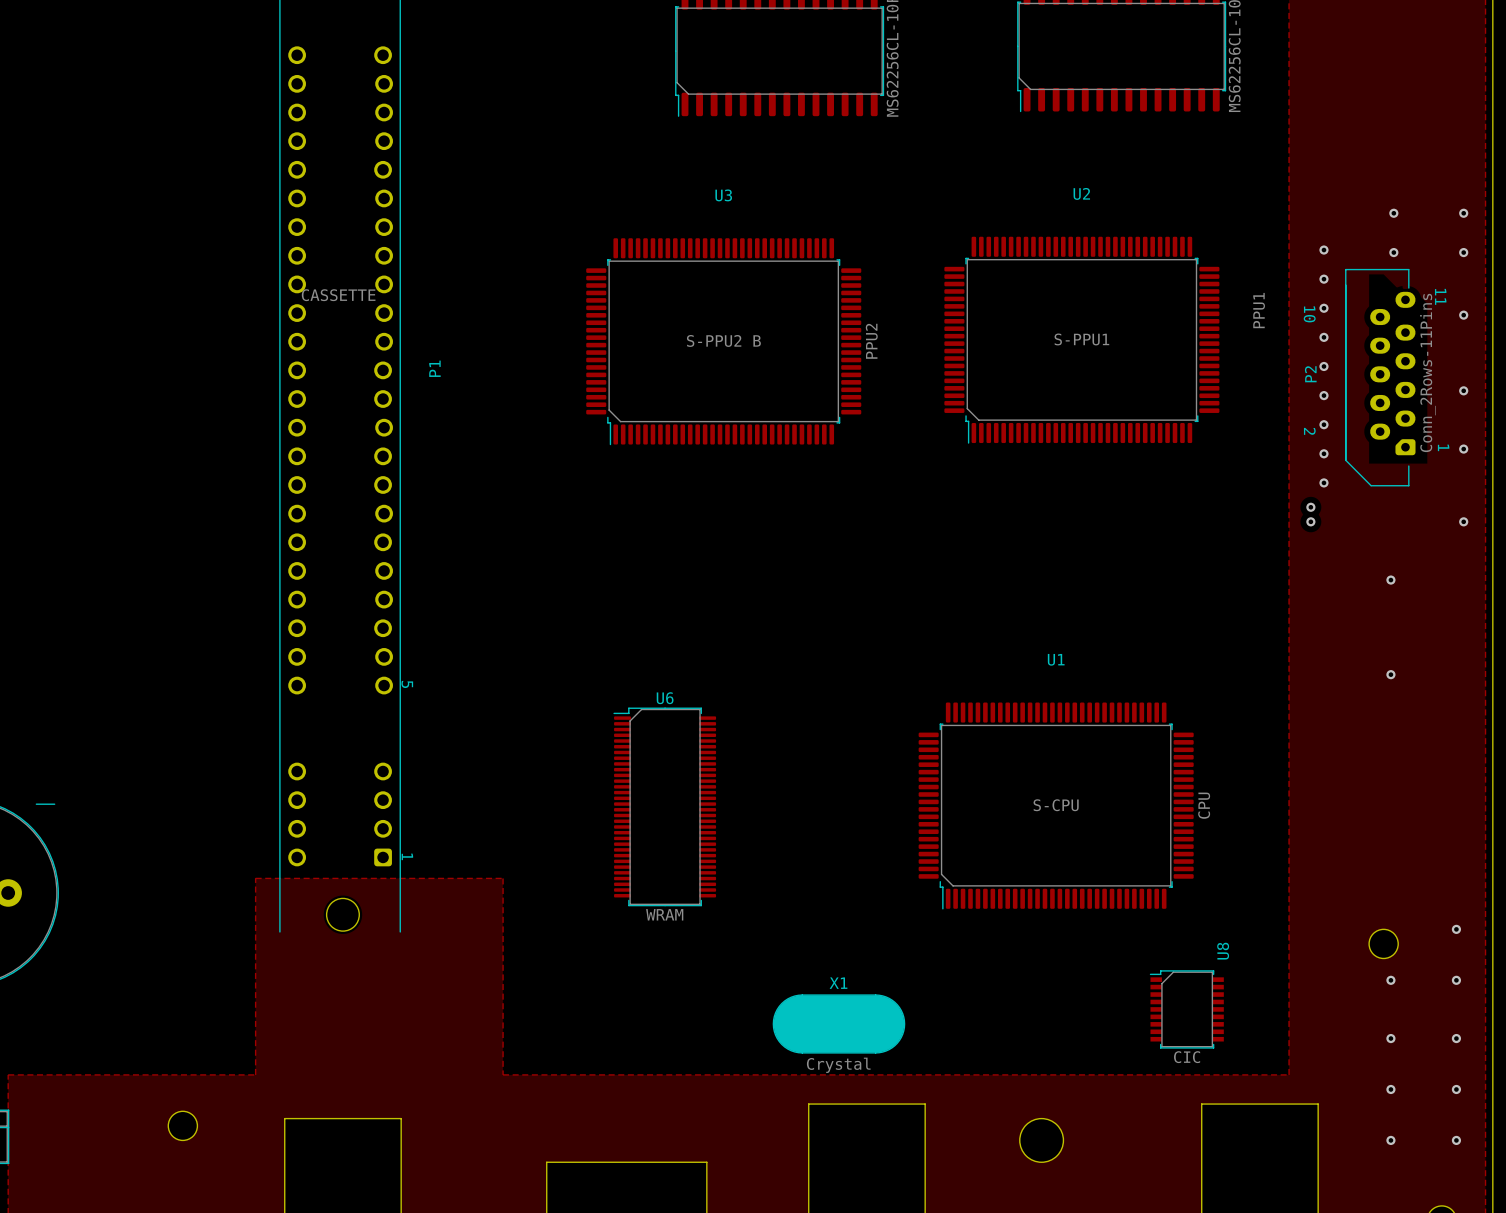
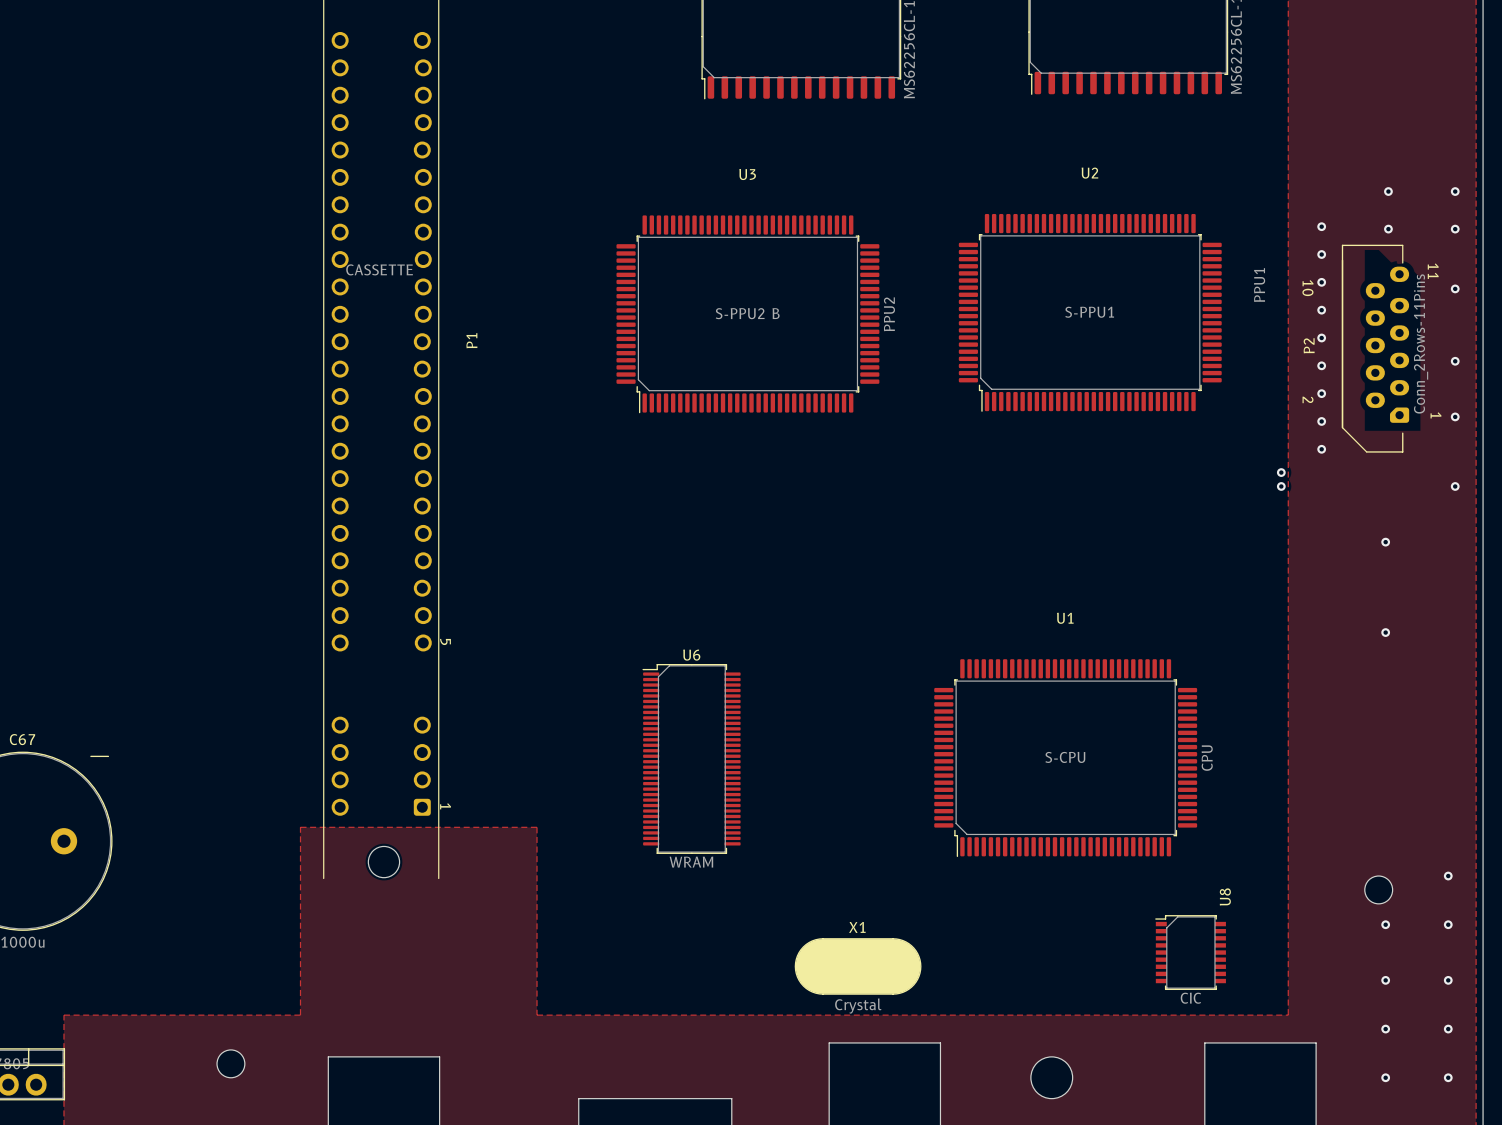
via: none -> (1281, 472)
via: (1310, 507) -> none
via: none -> (1281, 486)
via: (1310, 521) -> none

